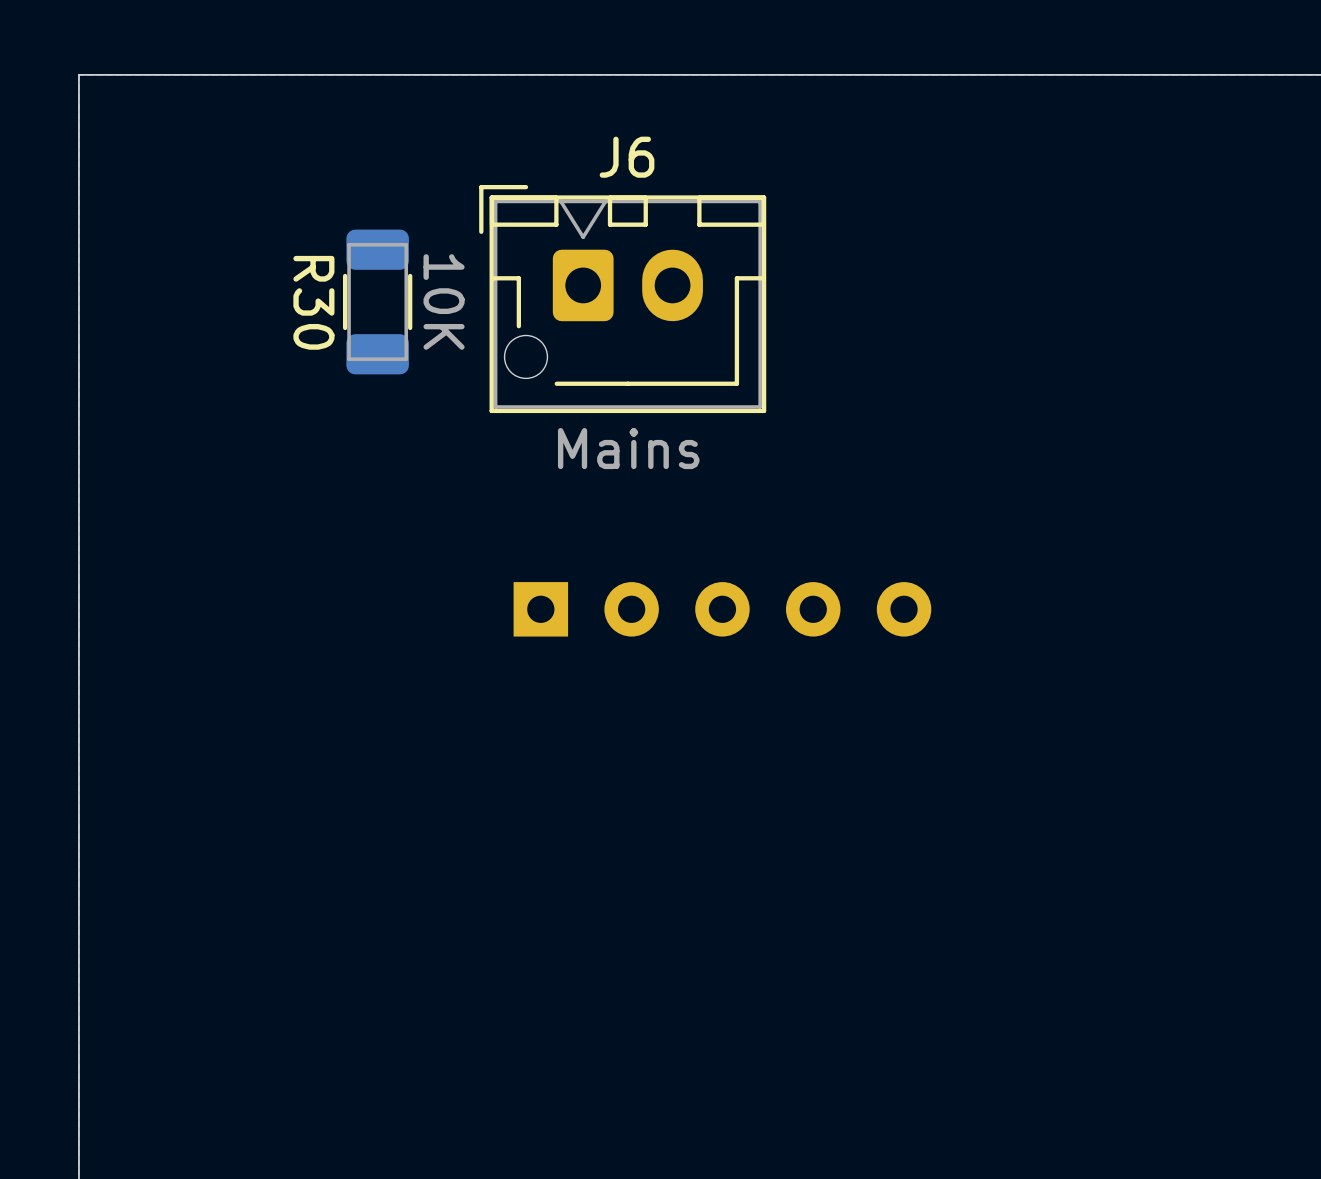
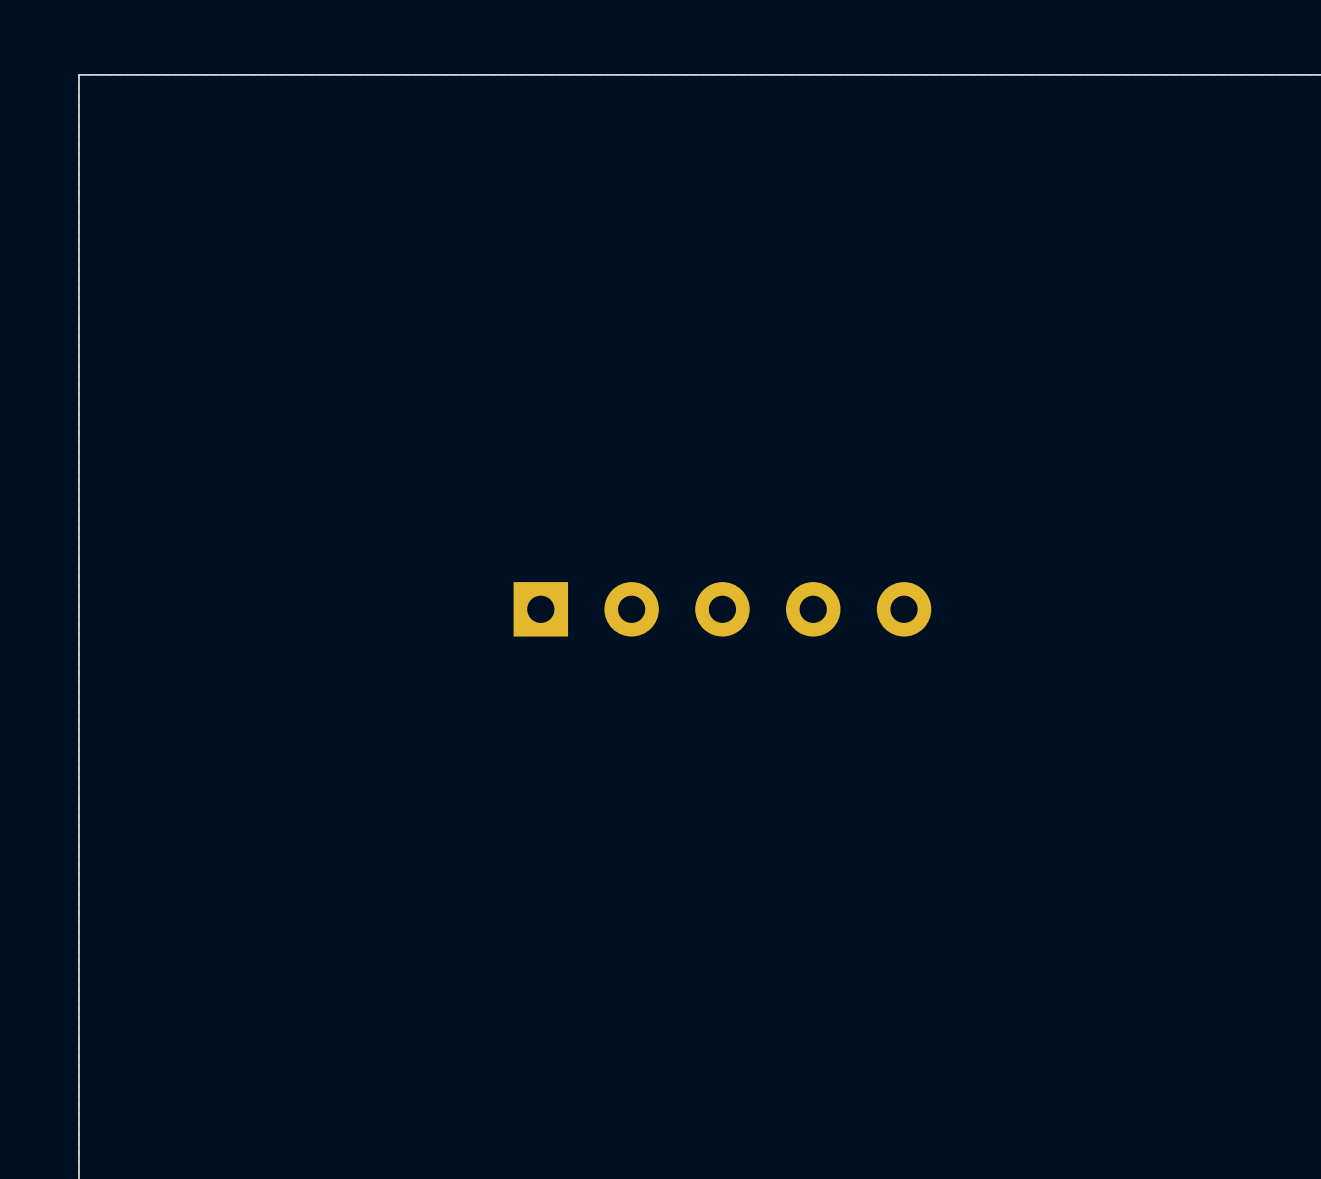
J6: Mains (622, 299) -> none
R30: 10K (377, 301) -> none

